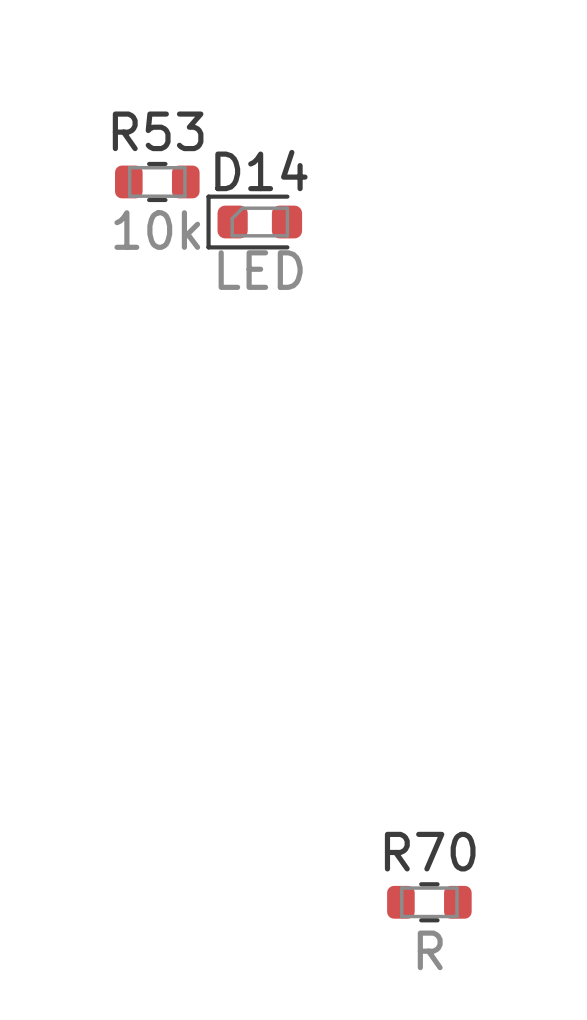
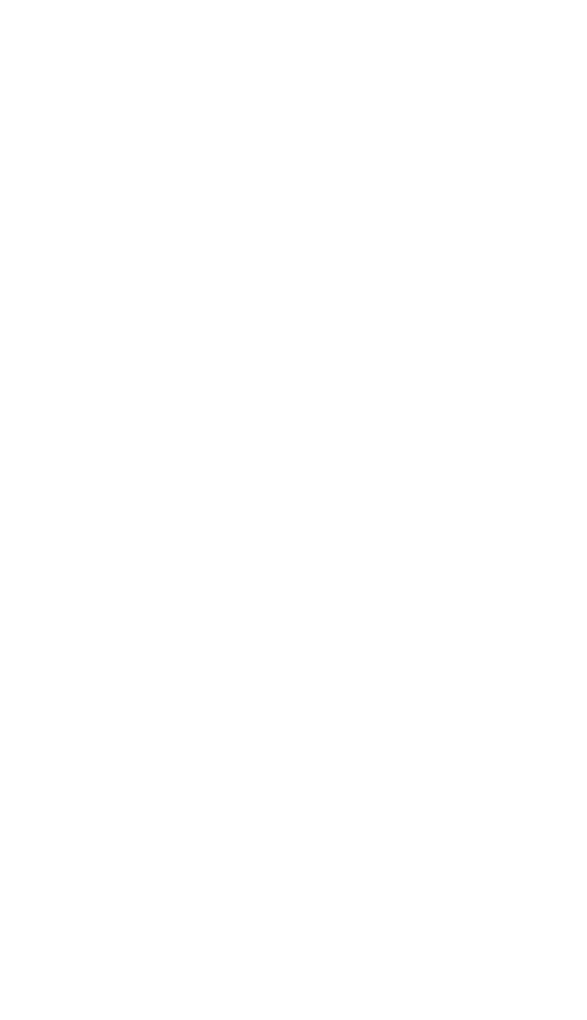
R53: 10k (157, 181) -> none
D14: LED (254, 222) -> none
R70: R (429, 902) -> none

